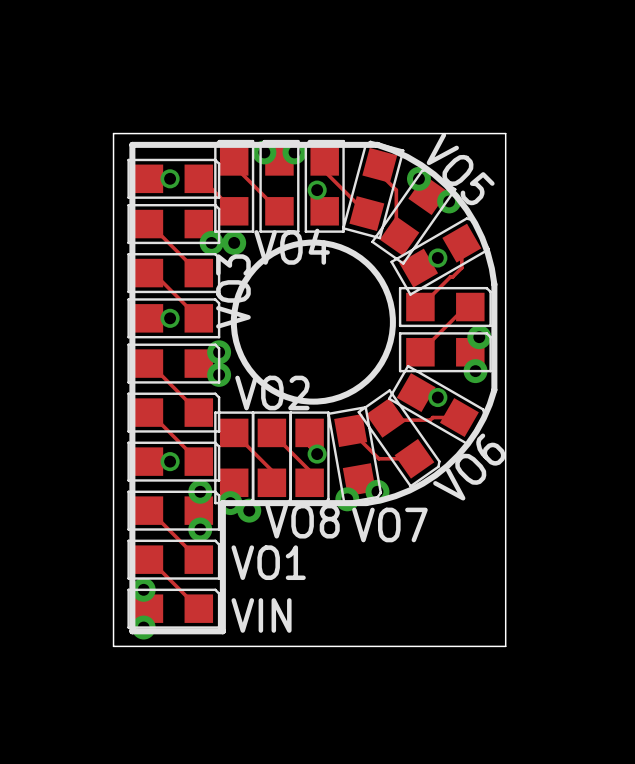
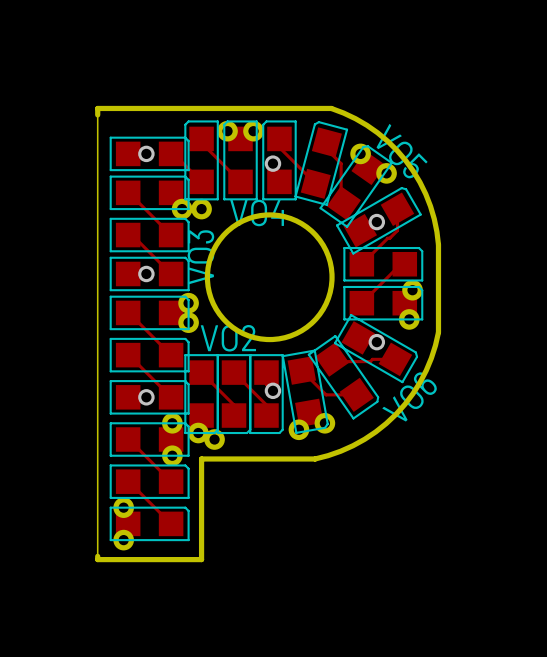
board edge: (113, 133) (505, 133) (505, 646) (113, 646) -> (97, 114) (97, 108) (331, 108) (343, 113) (366, 125) (387, 141) (413, 171) (430, 206) (438, 244) (438, 332) (435, 345) (420, 382) (404, 404) (386, 423) (352, 445) (315, 458) (201, 458) (201, 559) (97, 559) (97, 556)
line: (132, 144) (132, 631) (222, 631) (222, 503) (366, 503) (381, 500) (409, 490) (435, 475) (467, 443) (483, 418) (494, 389) (494, 284) (491, 268) (487, 252) (475, 223) (457, 196) (434, 174) (421, 165) (392, 150) (377, 144) (132, 144) -> none
drawing: [230, 239, 396, 405] -> none
round board edge: none -> [204, 212, 335, 343]
VO8 name: VO8 (302, 521) -> none
VO7 name: VO7 (389, 524) -> none
VO1 name: VO1 (268, 562) -> none
VIN name: VIN (261, 615) -> none

